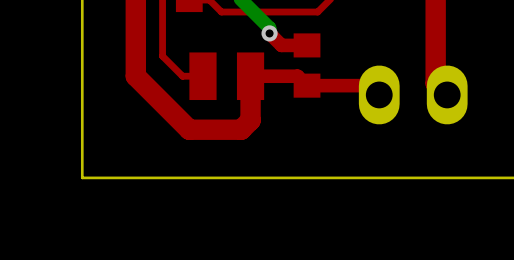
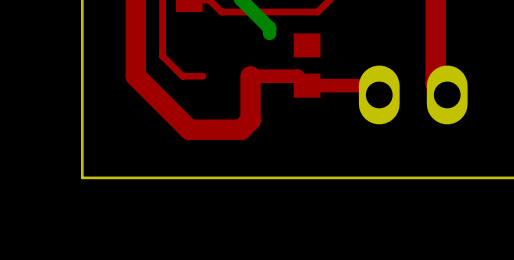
top track: (269, 33) (281, 45) (307, 45) -> none
via: (269, 33) -> none
part: (226, 76) -> none

